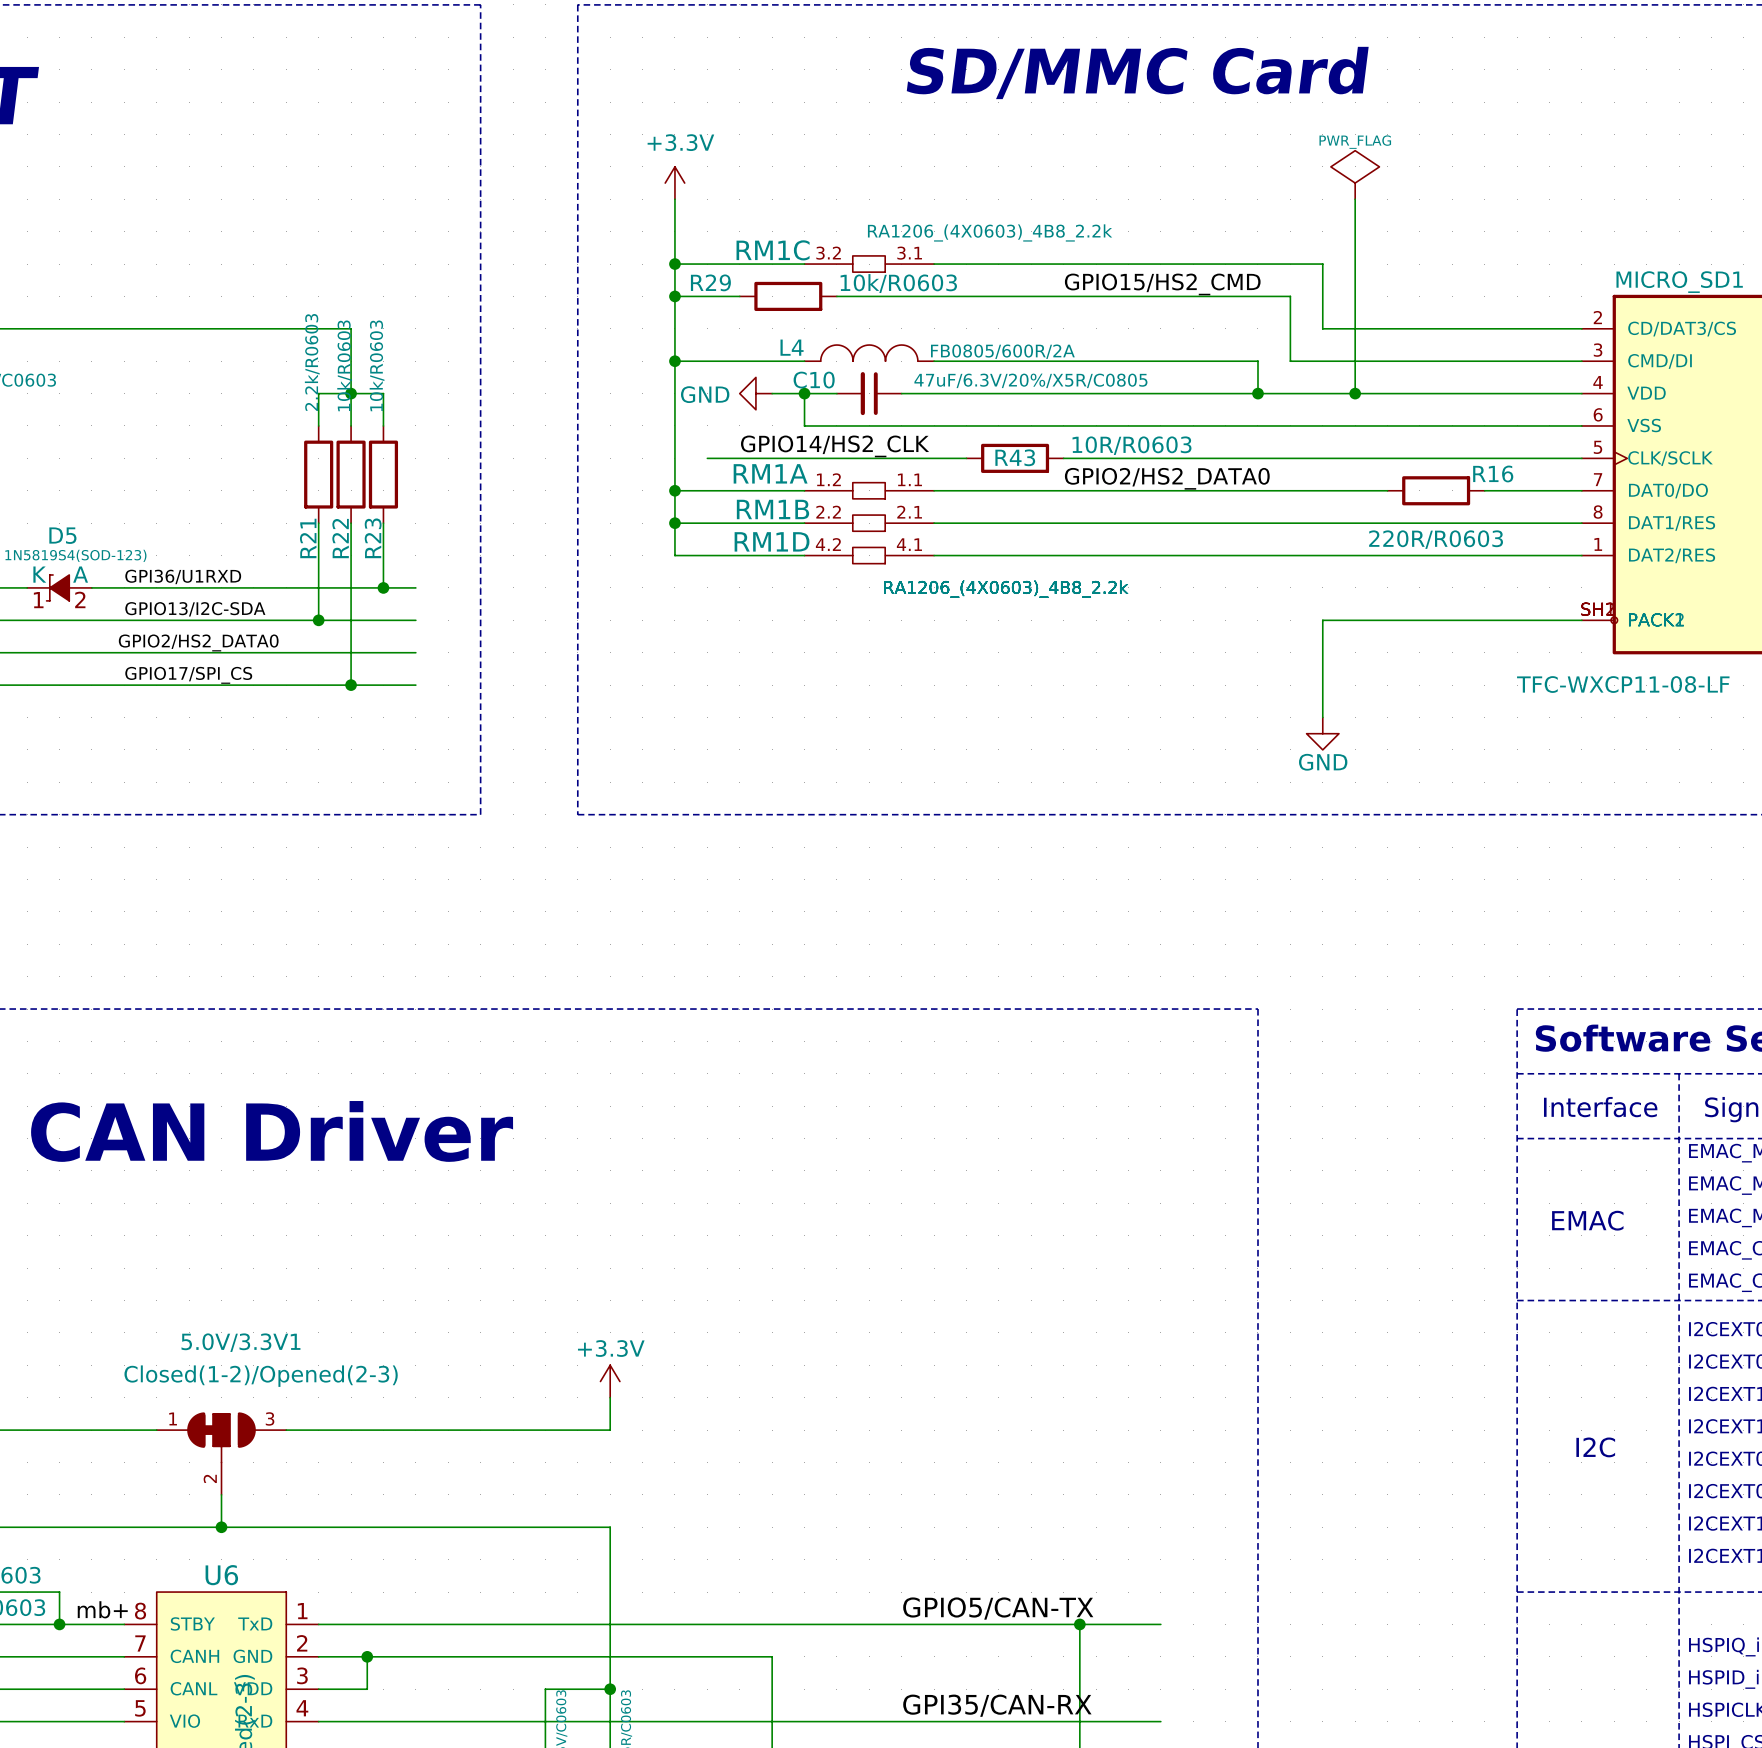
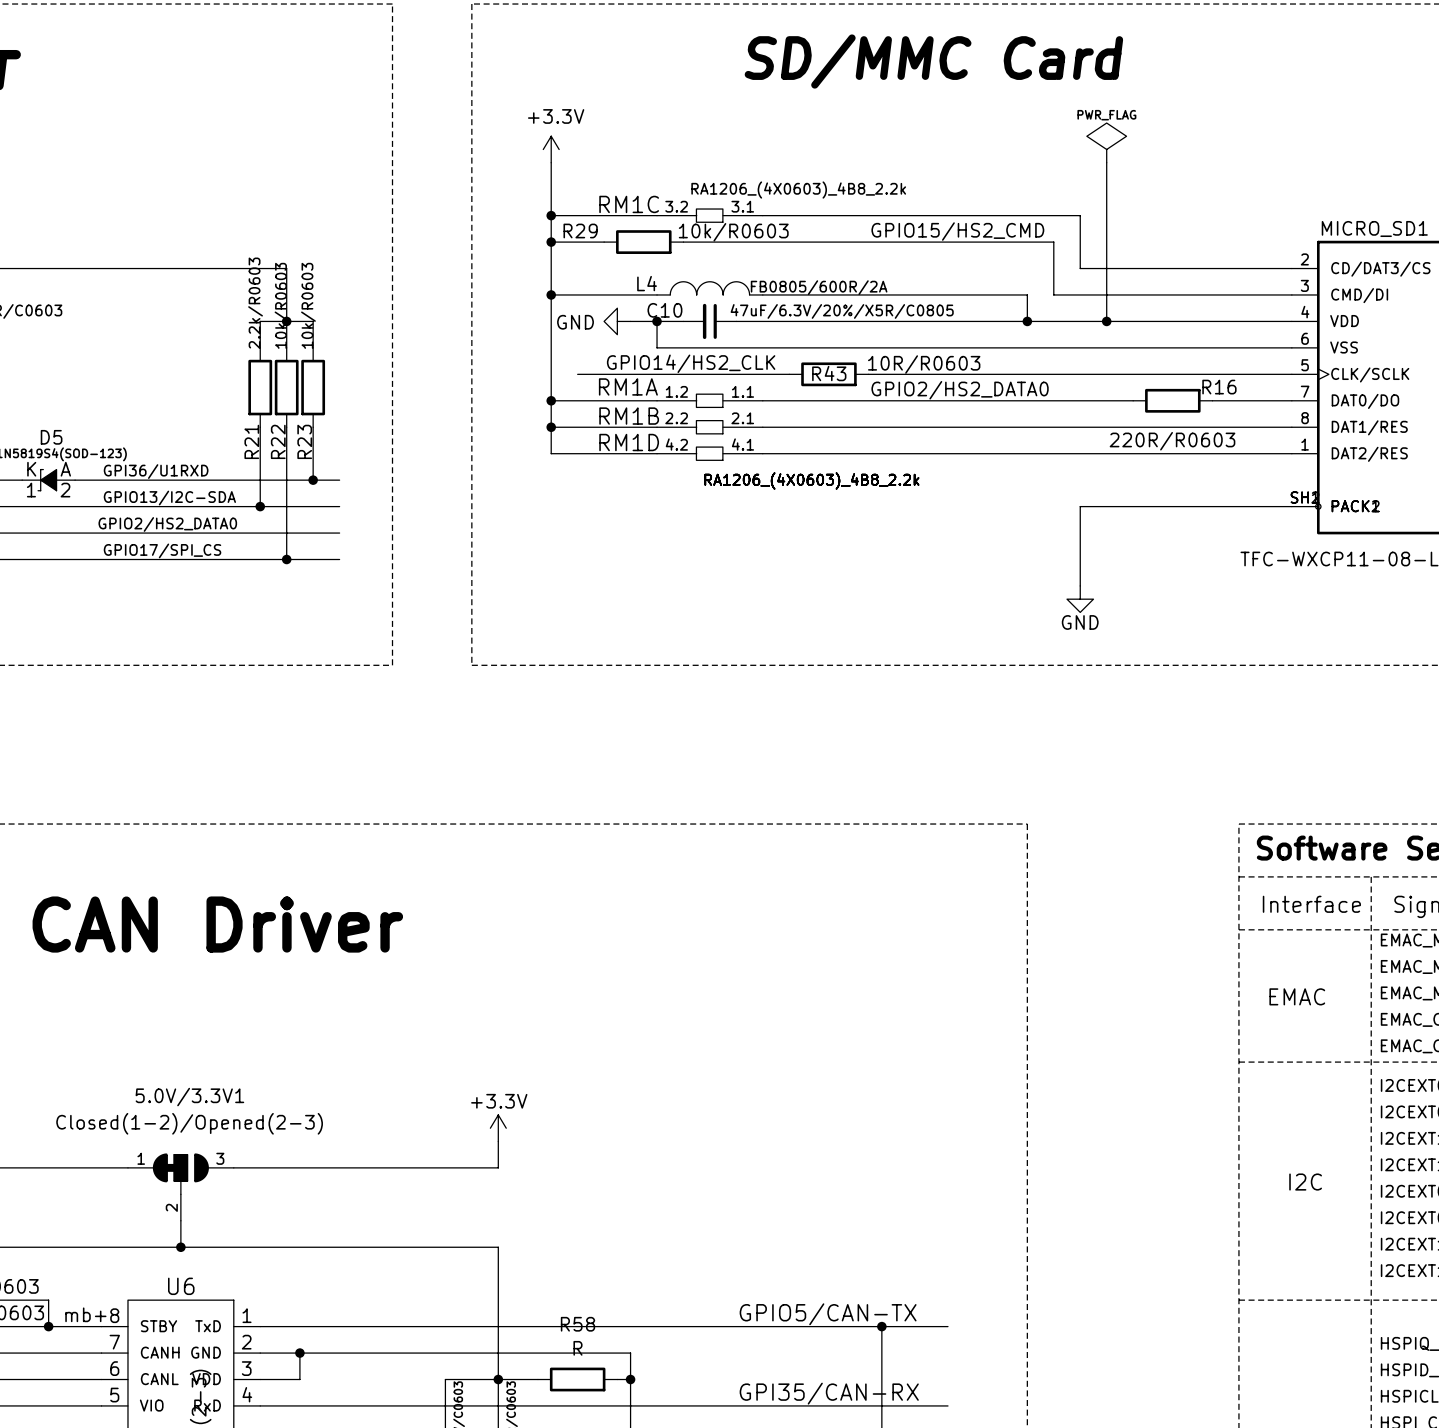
wire: none -> (498, 1379) (537, 1379)
R58: none -> R (577, 1379)
wire: none -> (617, 1379) (630, 1379)
junction: none -> (630, 1379)

